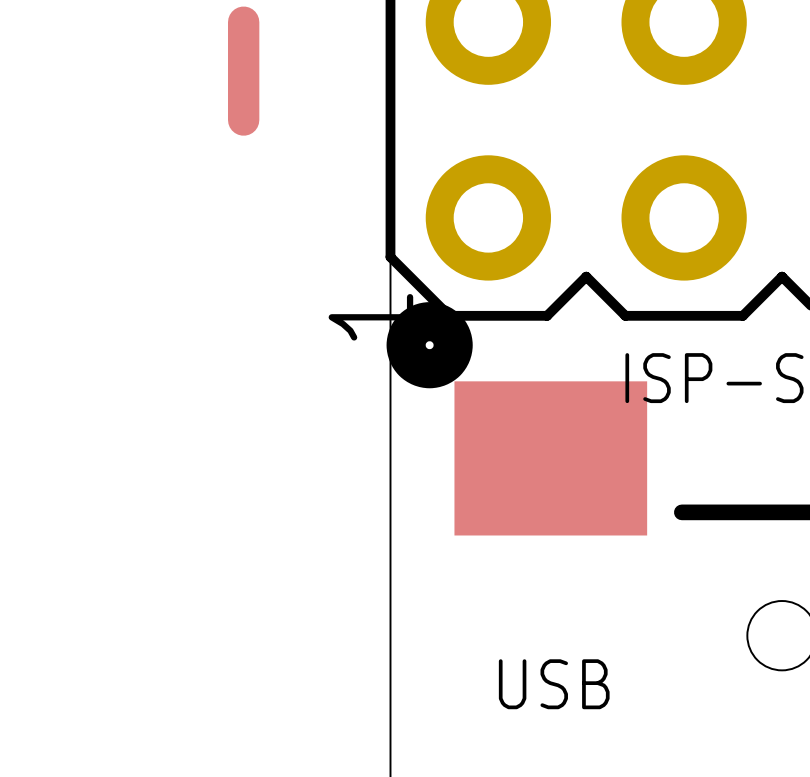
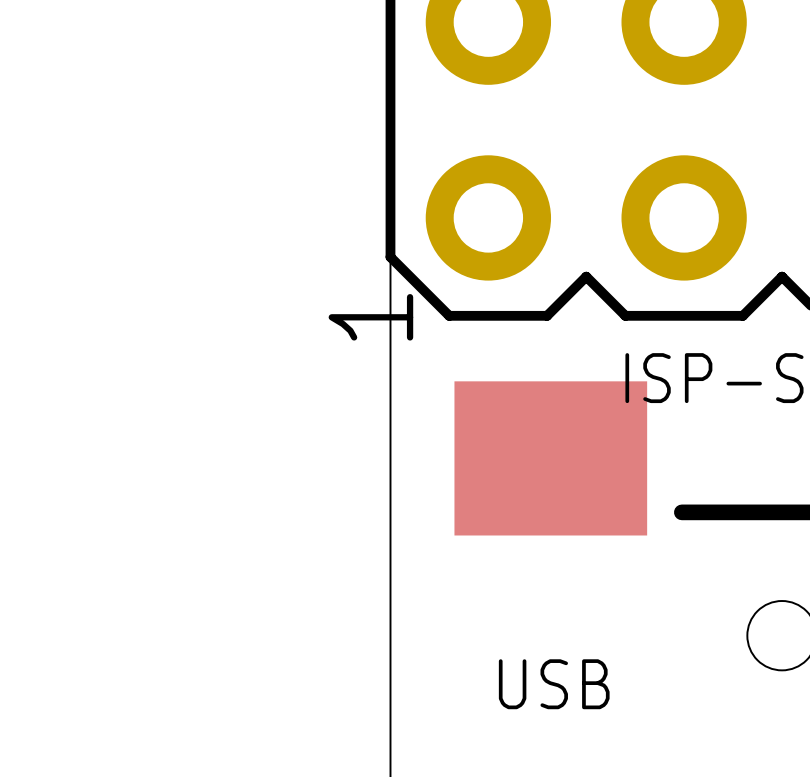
track: (243, 22) (243, 120) -> none
drawing: [386, 302, 473, 389] -> none

